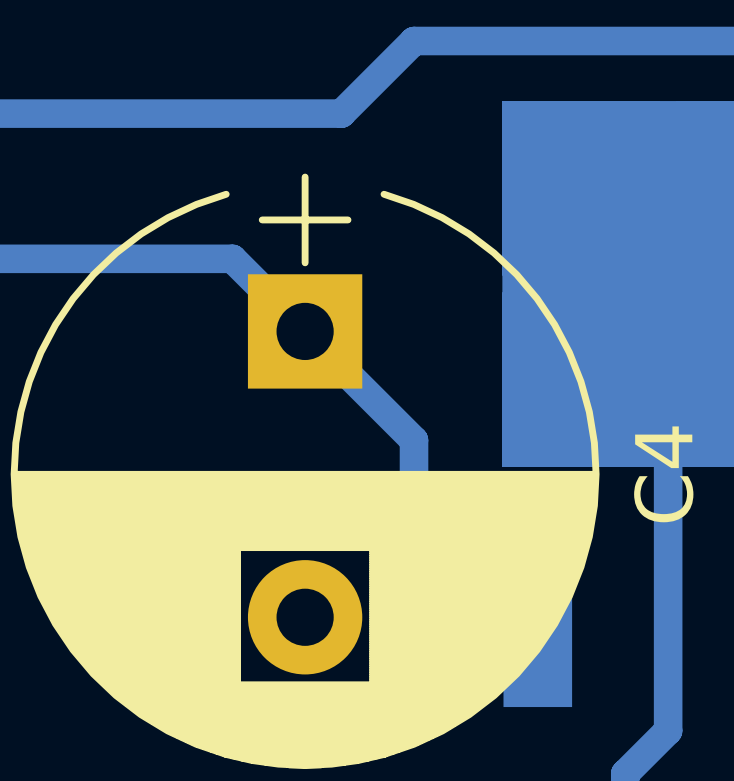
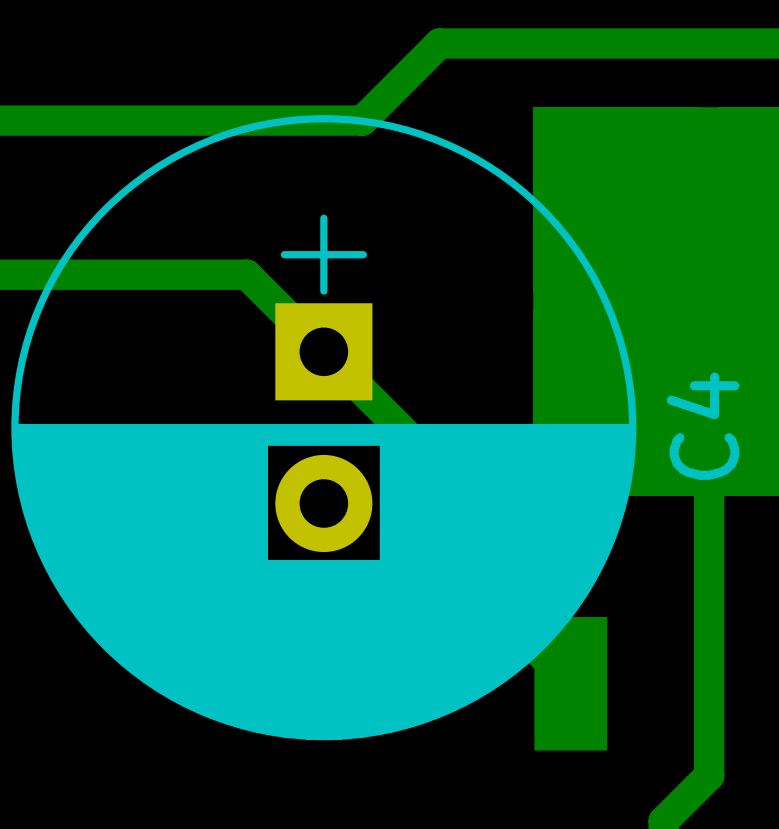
C4 footprint: [10, 173, 600, 769] -> [11, 115, 637, 741]

